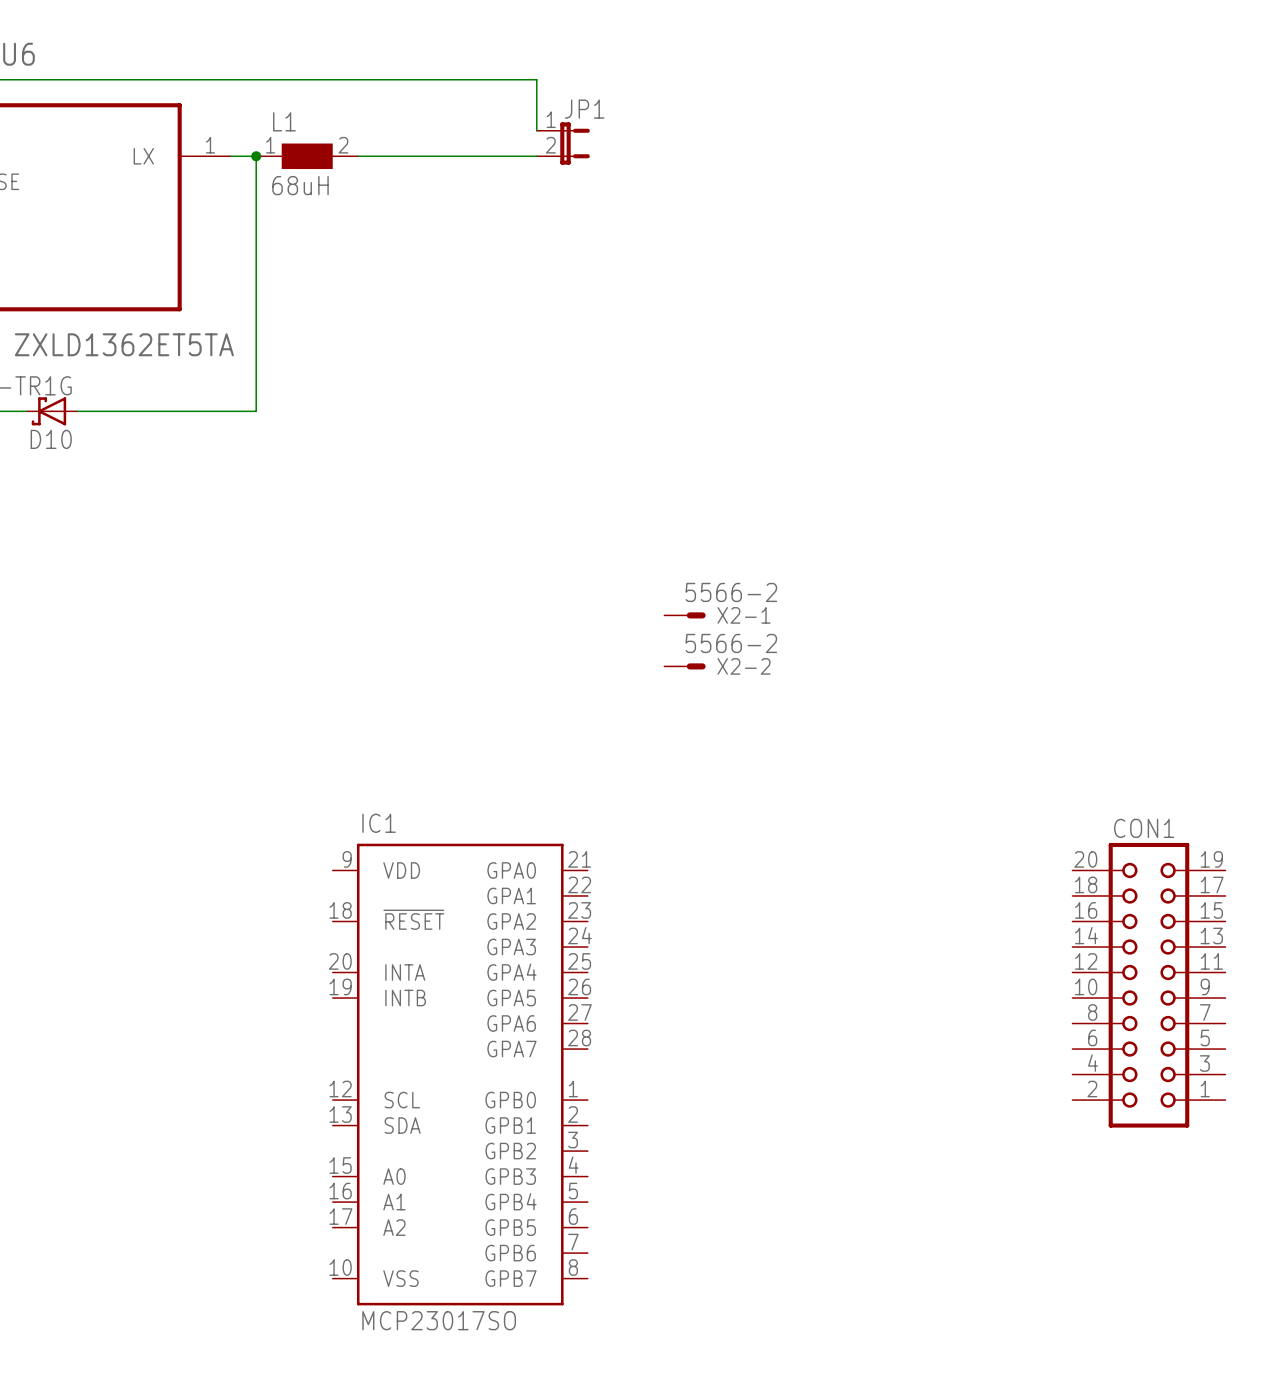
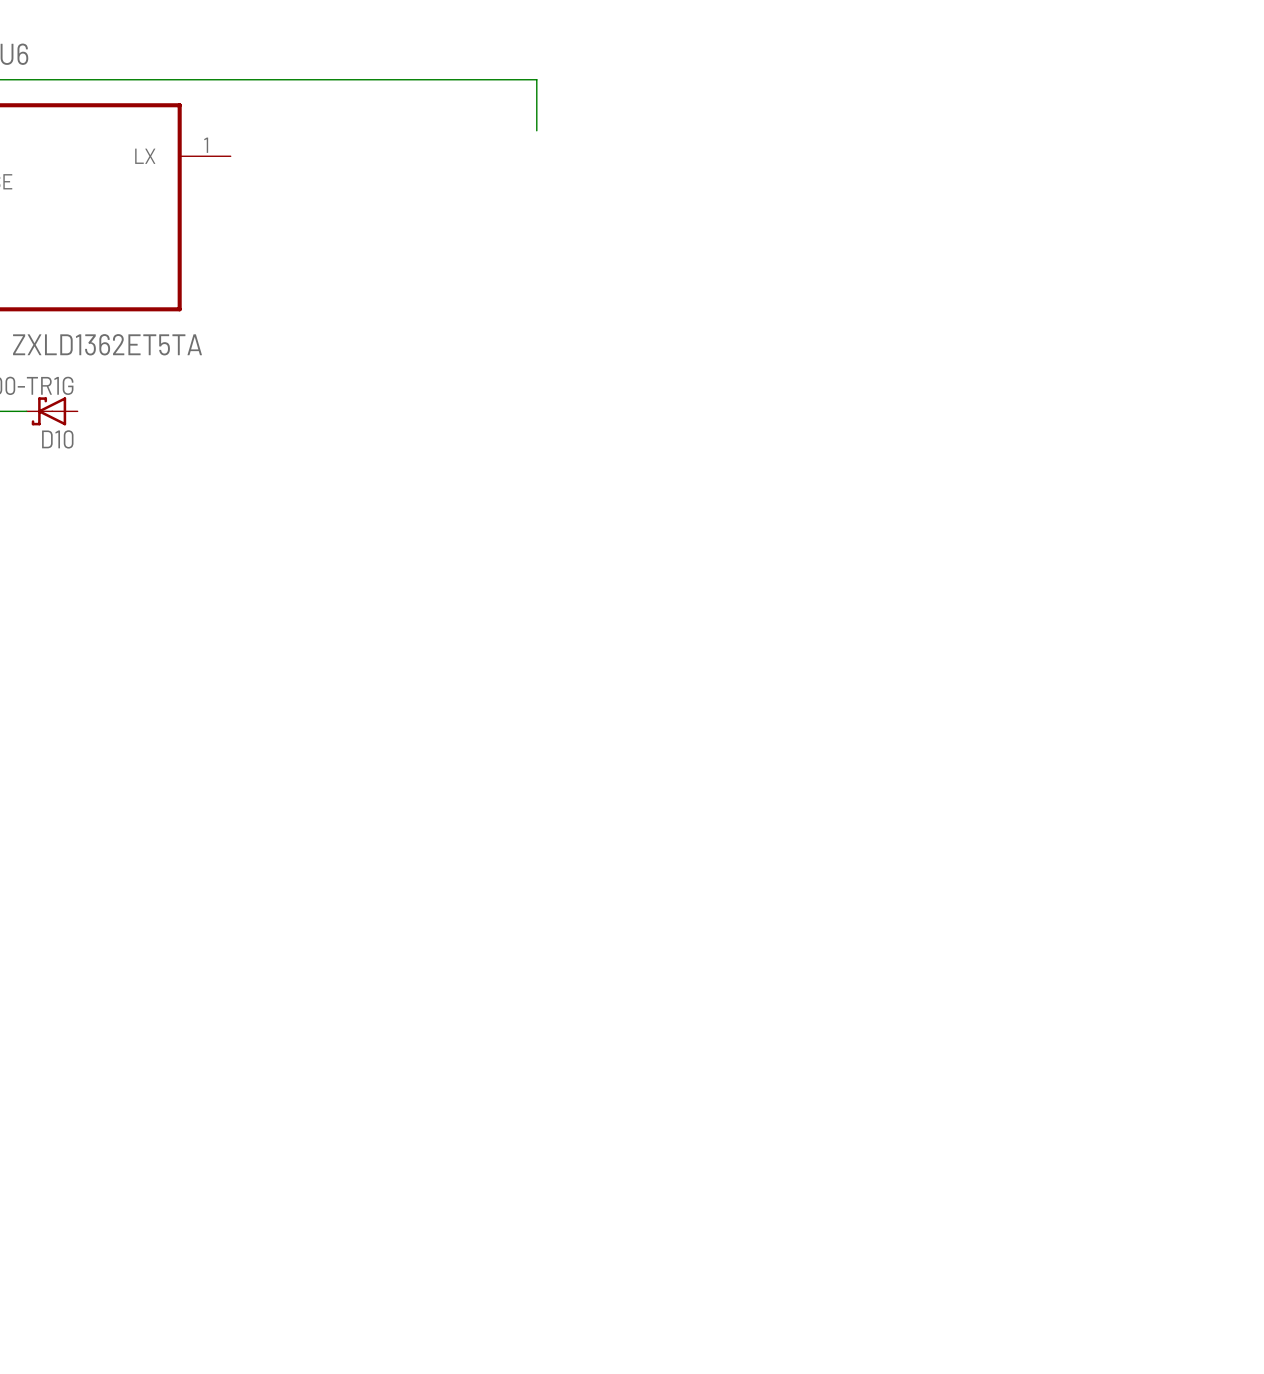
JP1: (563, 143) -> none
wire: (230, 156) (256, 156) (256, 411) (77, 411) -> none
junction: (256, 156) -> none
L1: 68uH (307, 156) -> none
wire: (358, 156) (536, 156) -> none
X2-1: 5566-2 (684, 615) -> none
X2-2: 5566-2 (684, 666) -> none
CON1: (1148, 985) -> none
IC1: MCP23017SO (460, 1074) -> none

